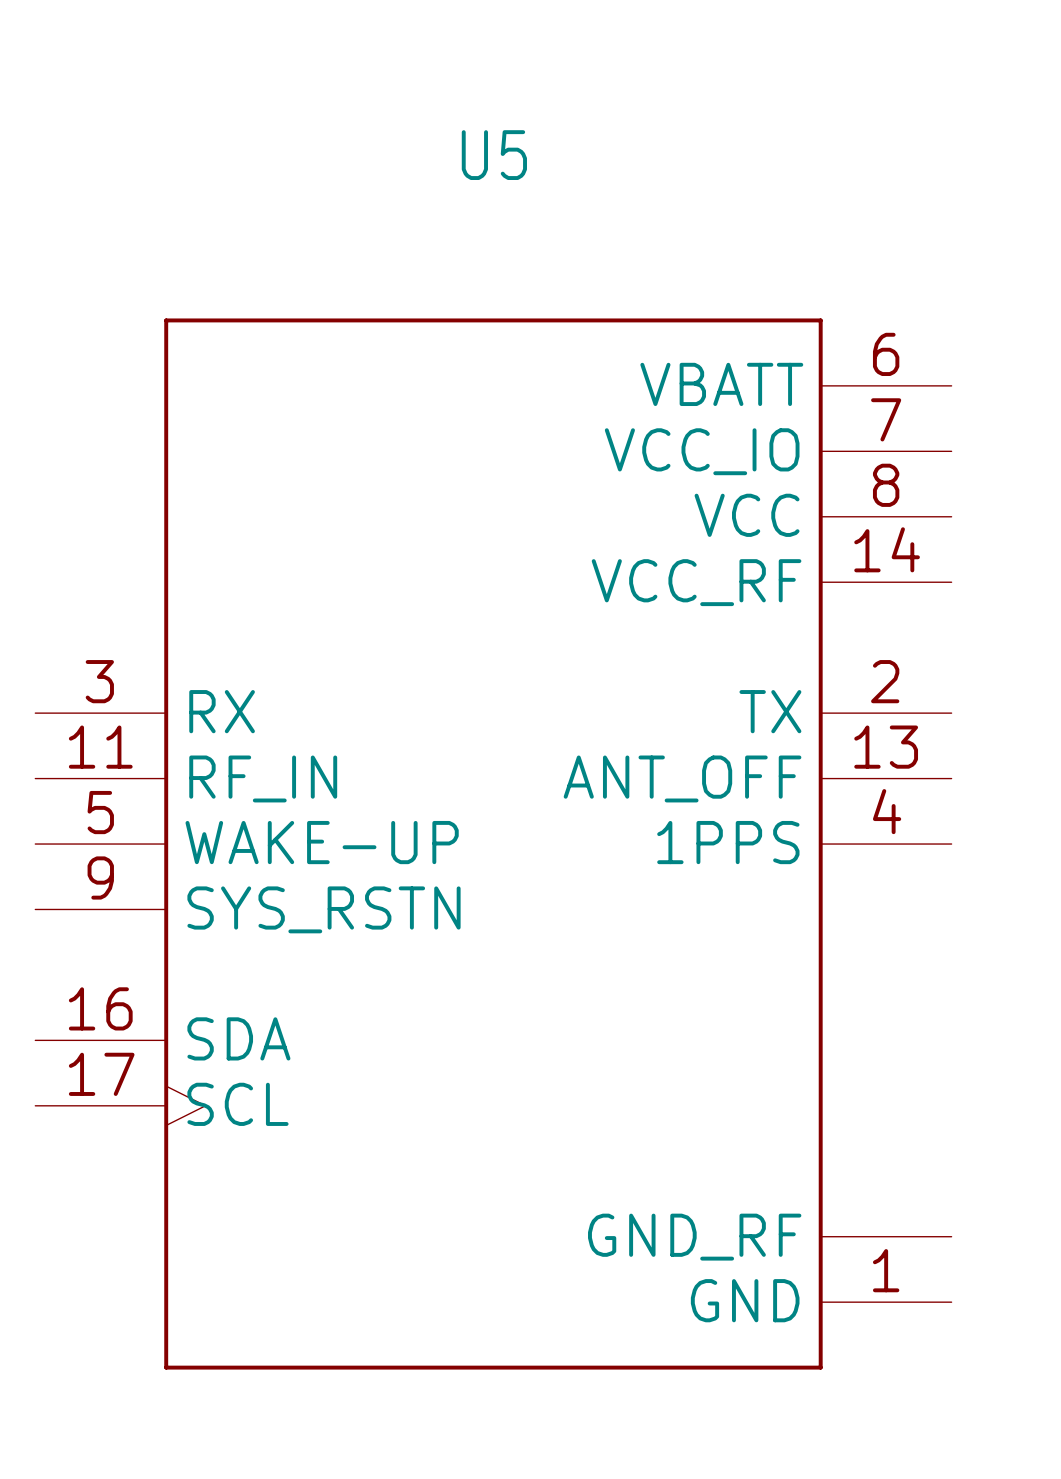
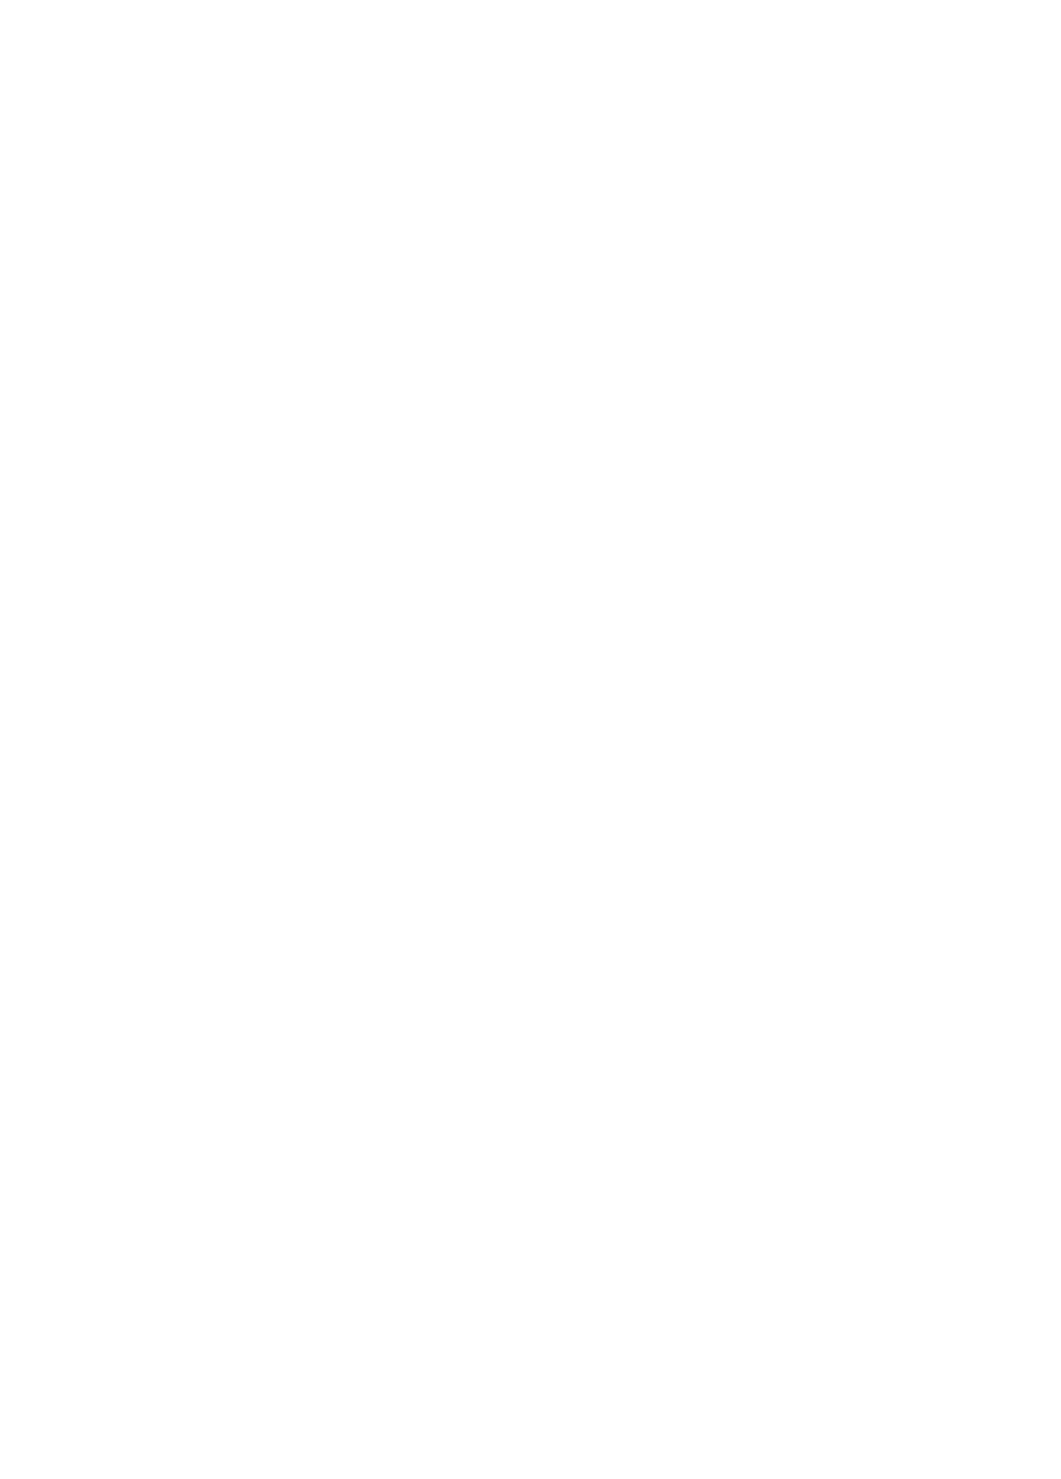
U5: (493, 844) -> none

